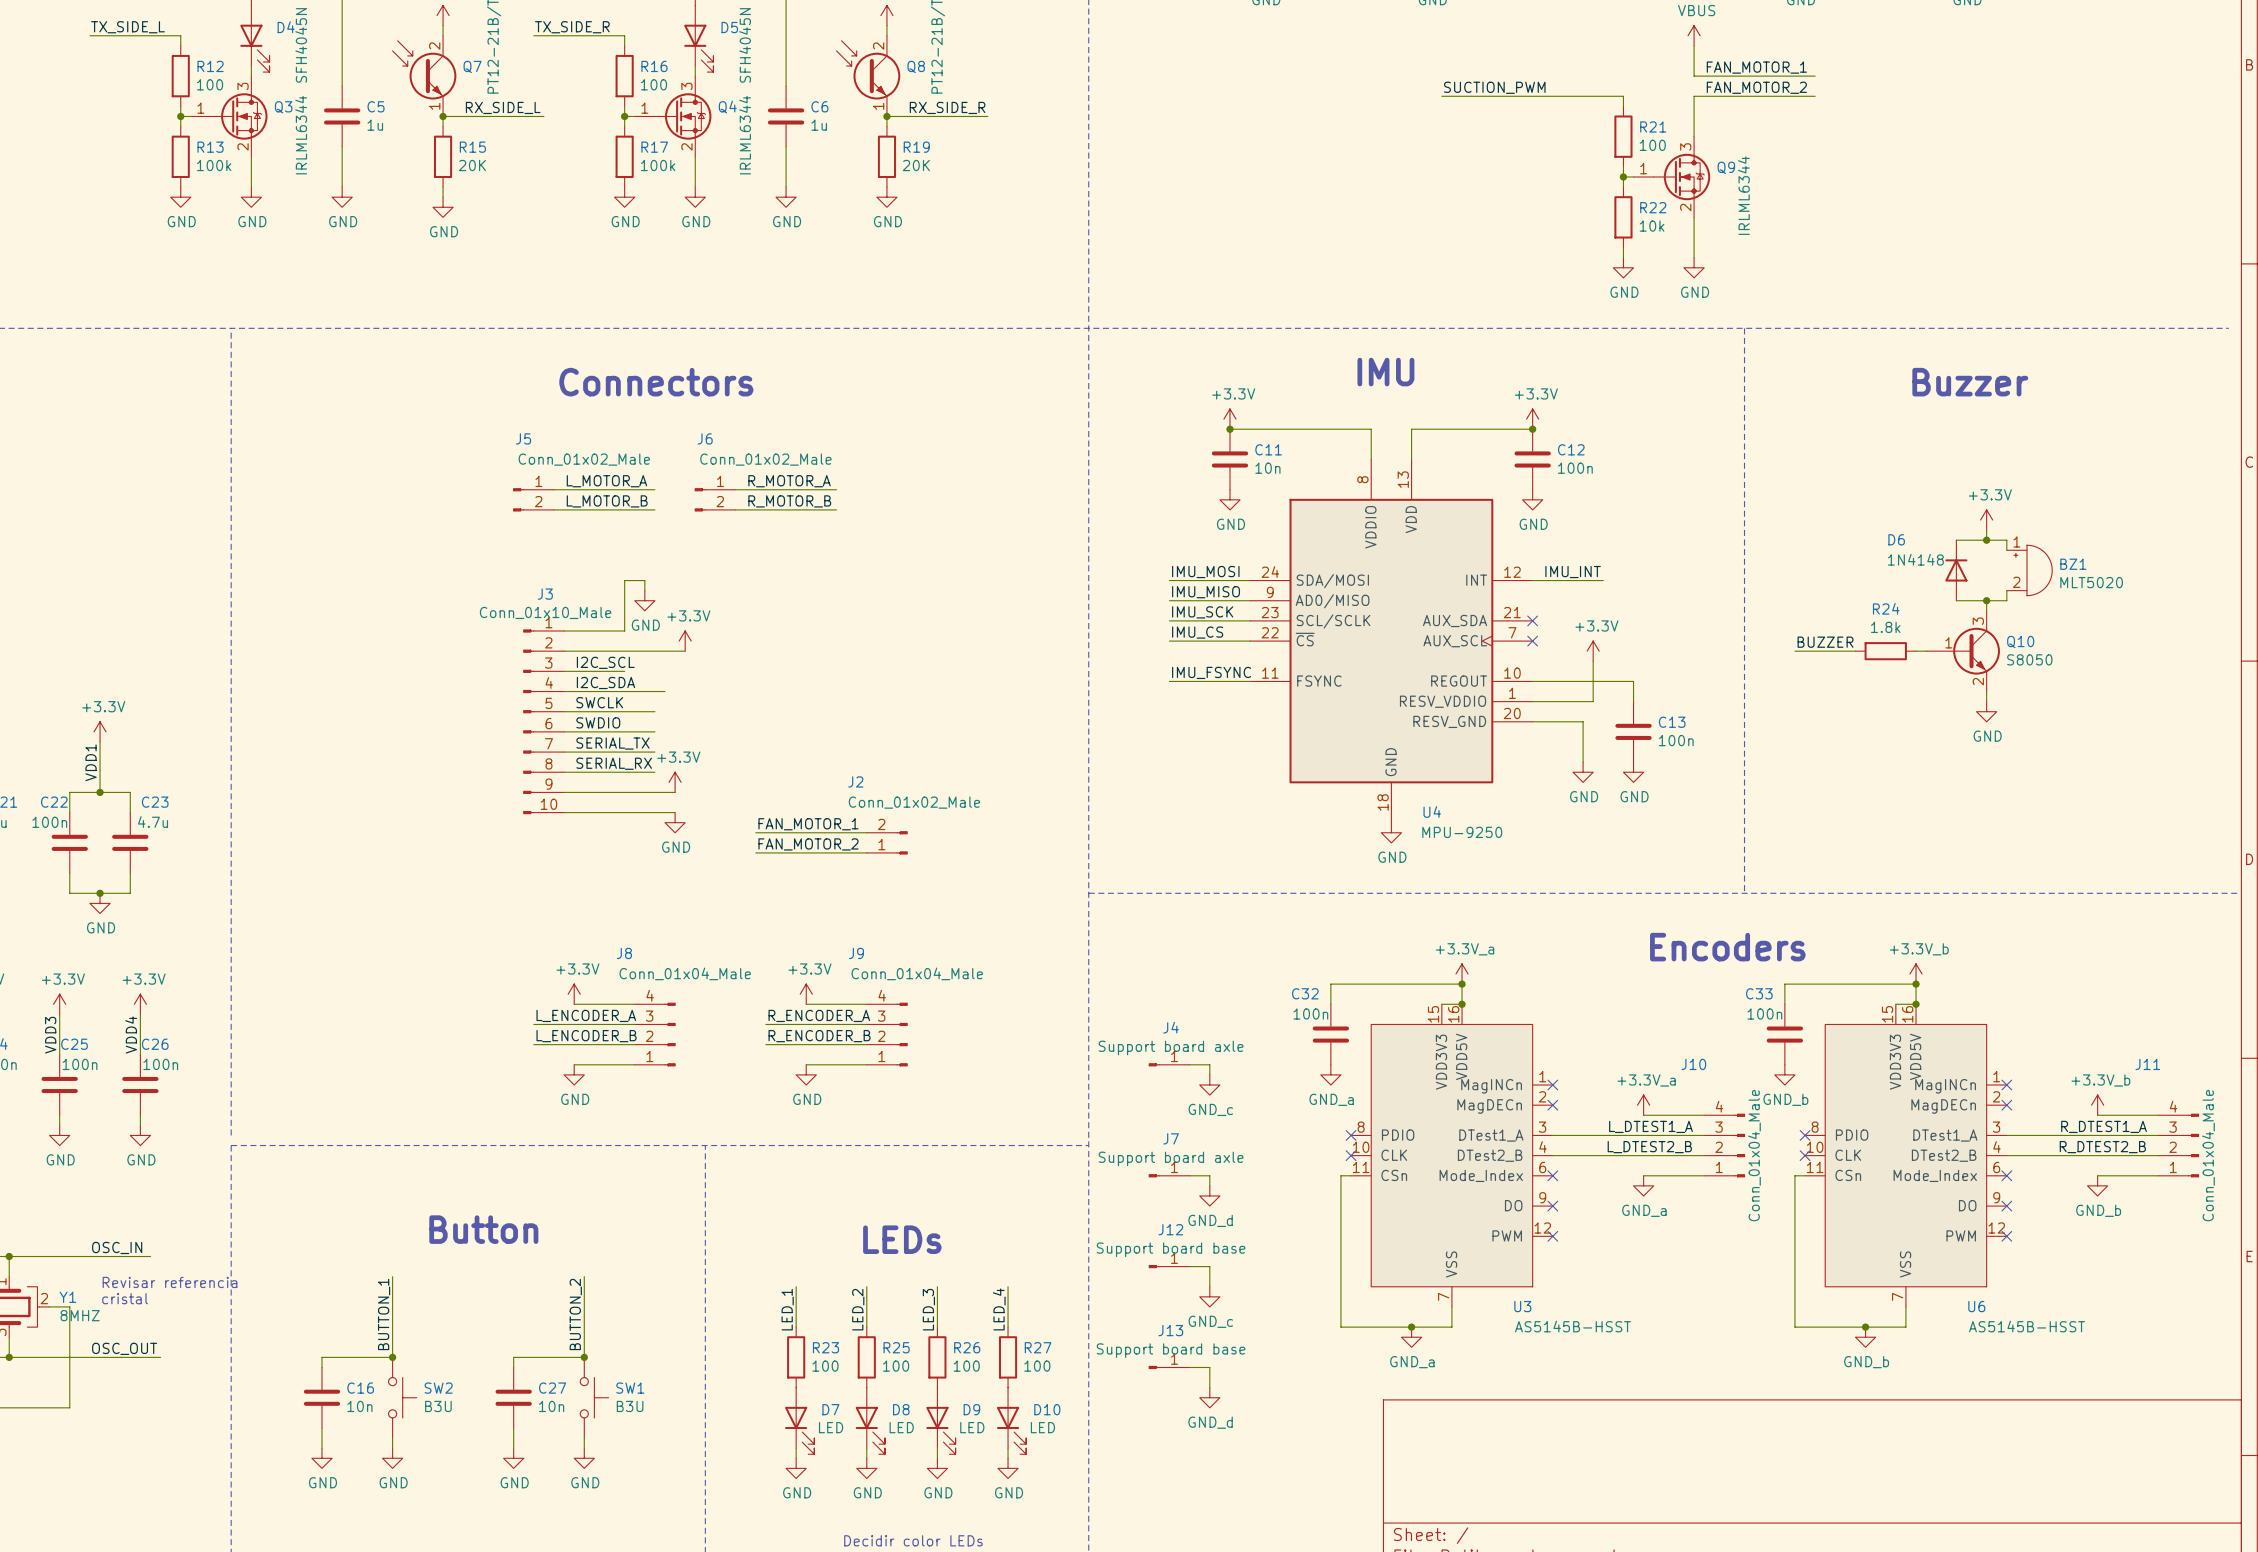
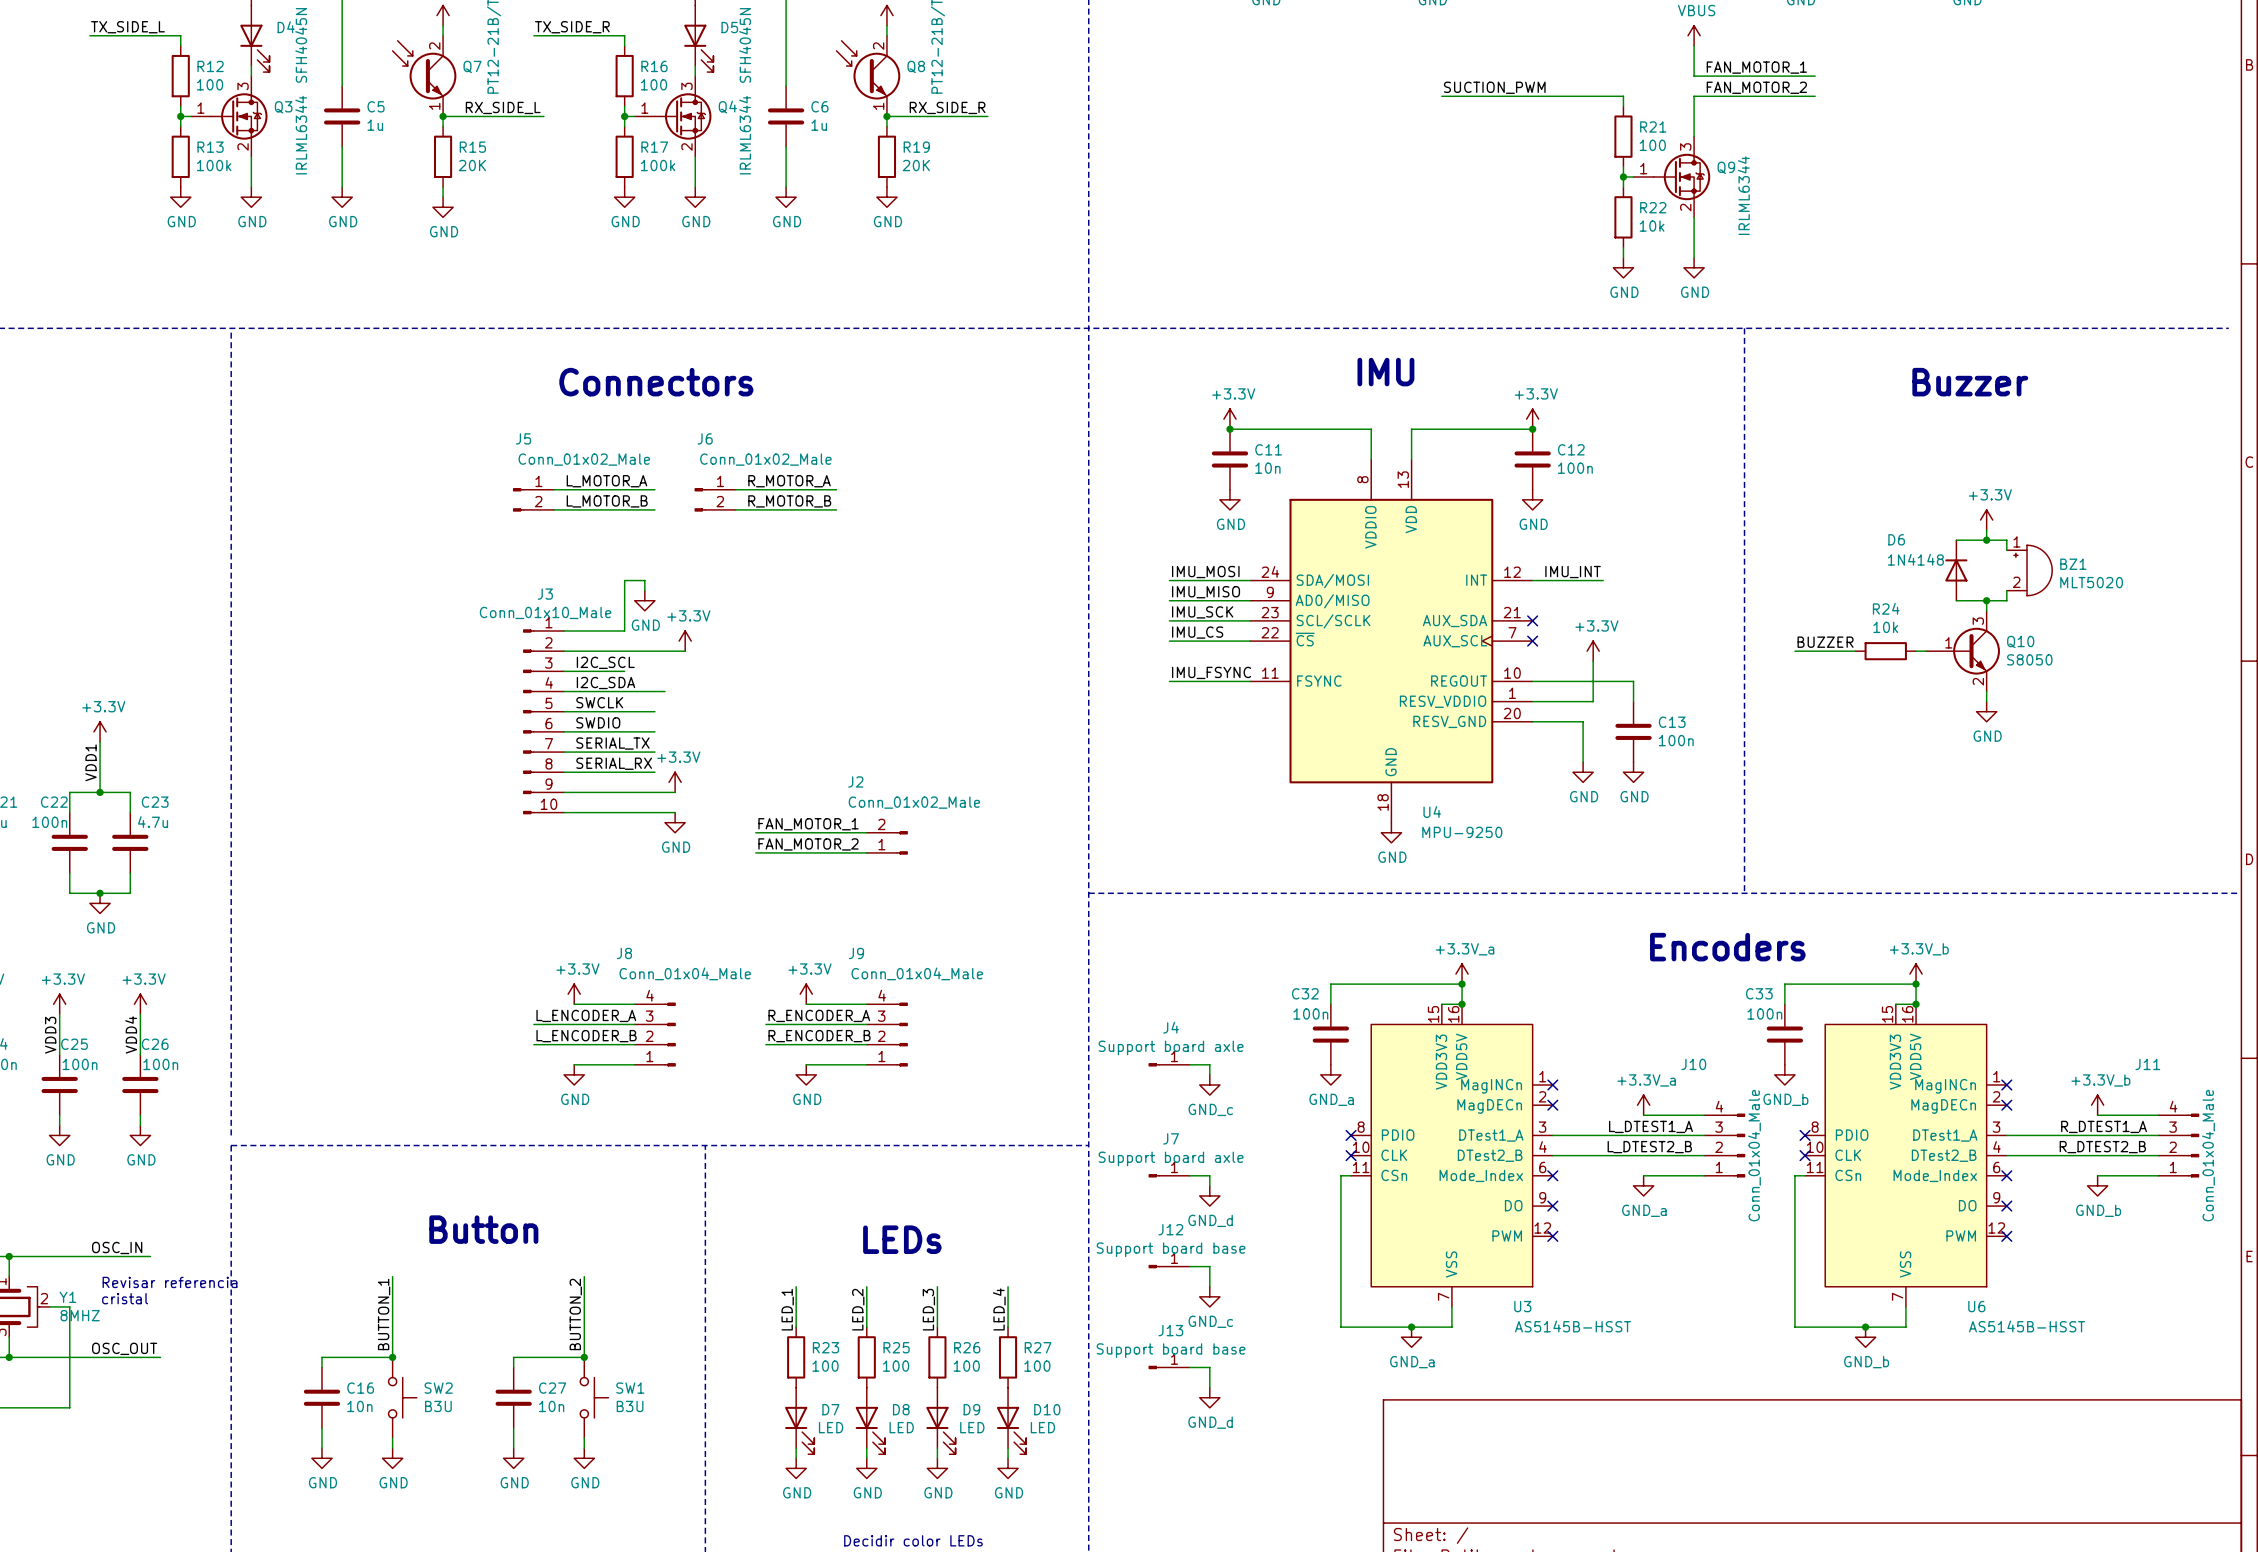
R24 value: 1.8k (1885, 627) -> 10k (1885, 627)

